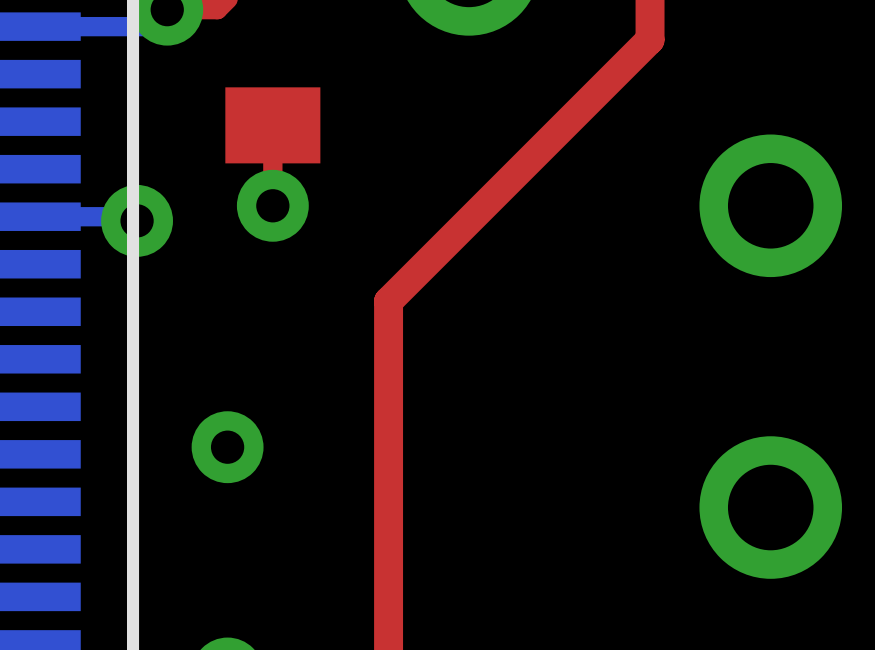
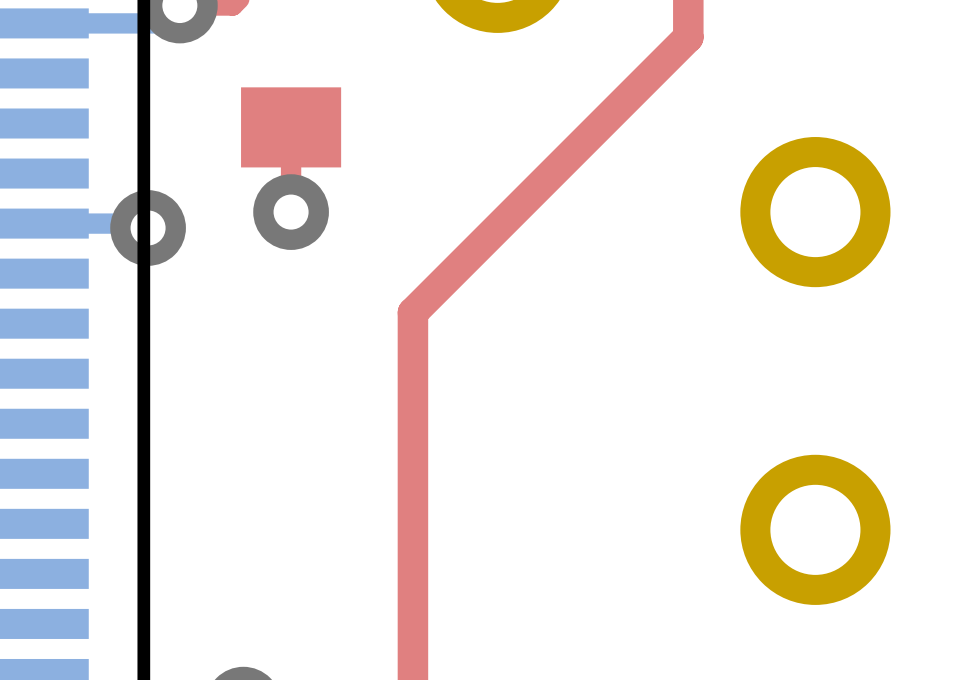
via: (227, 447) -> none

